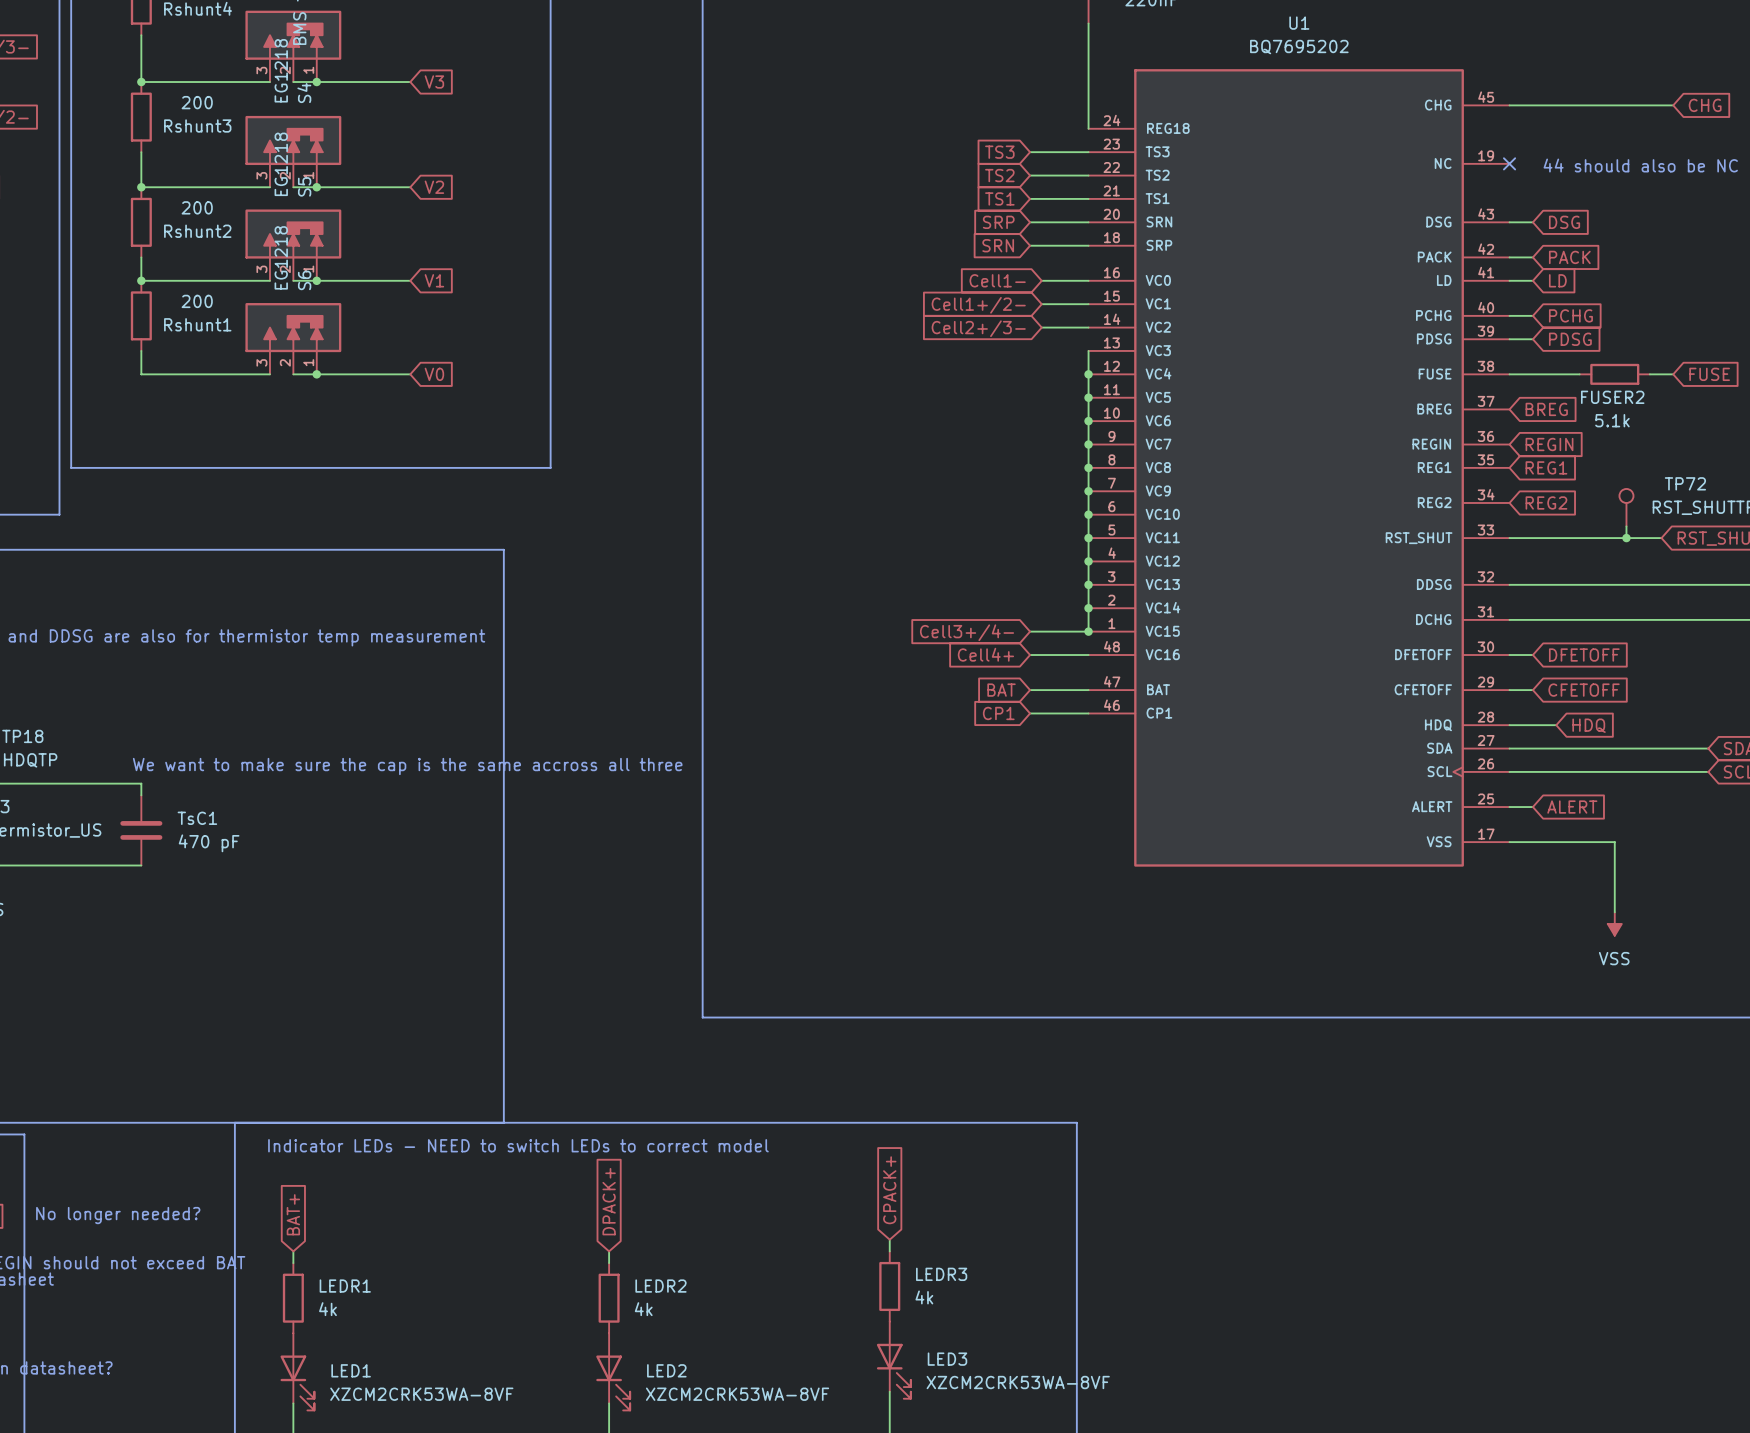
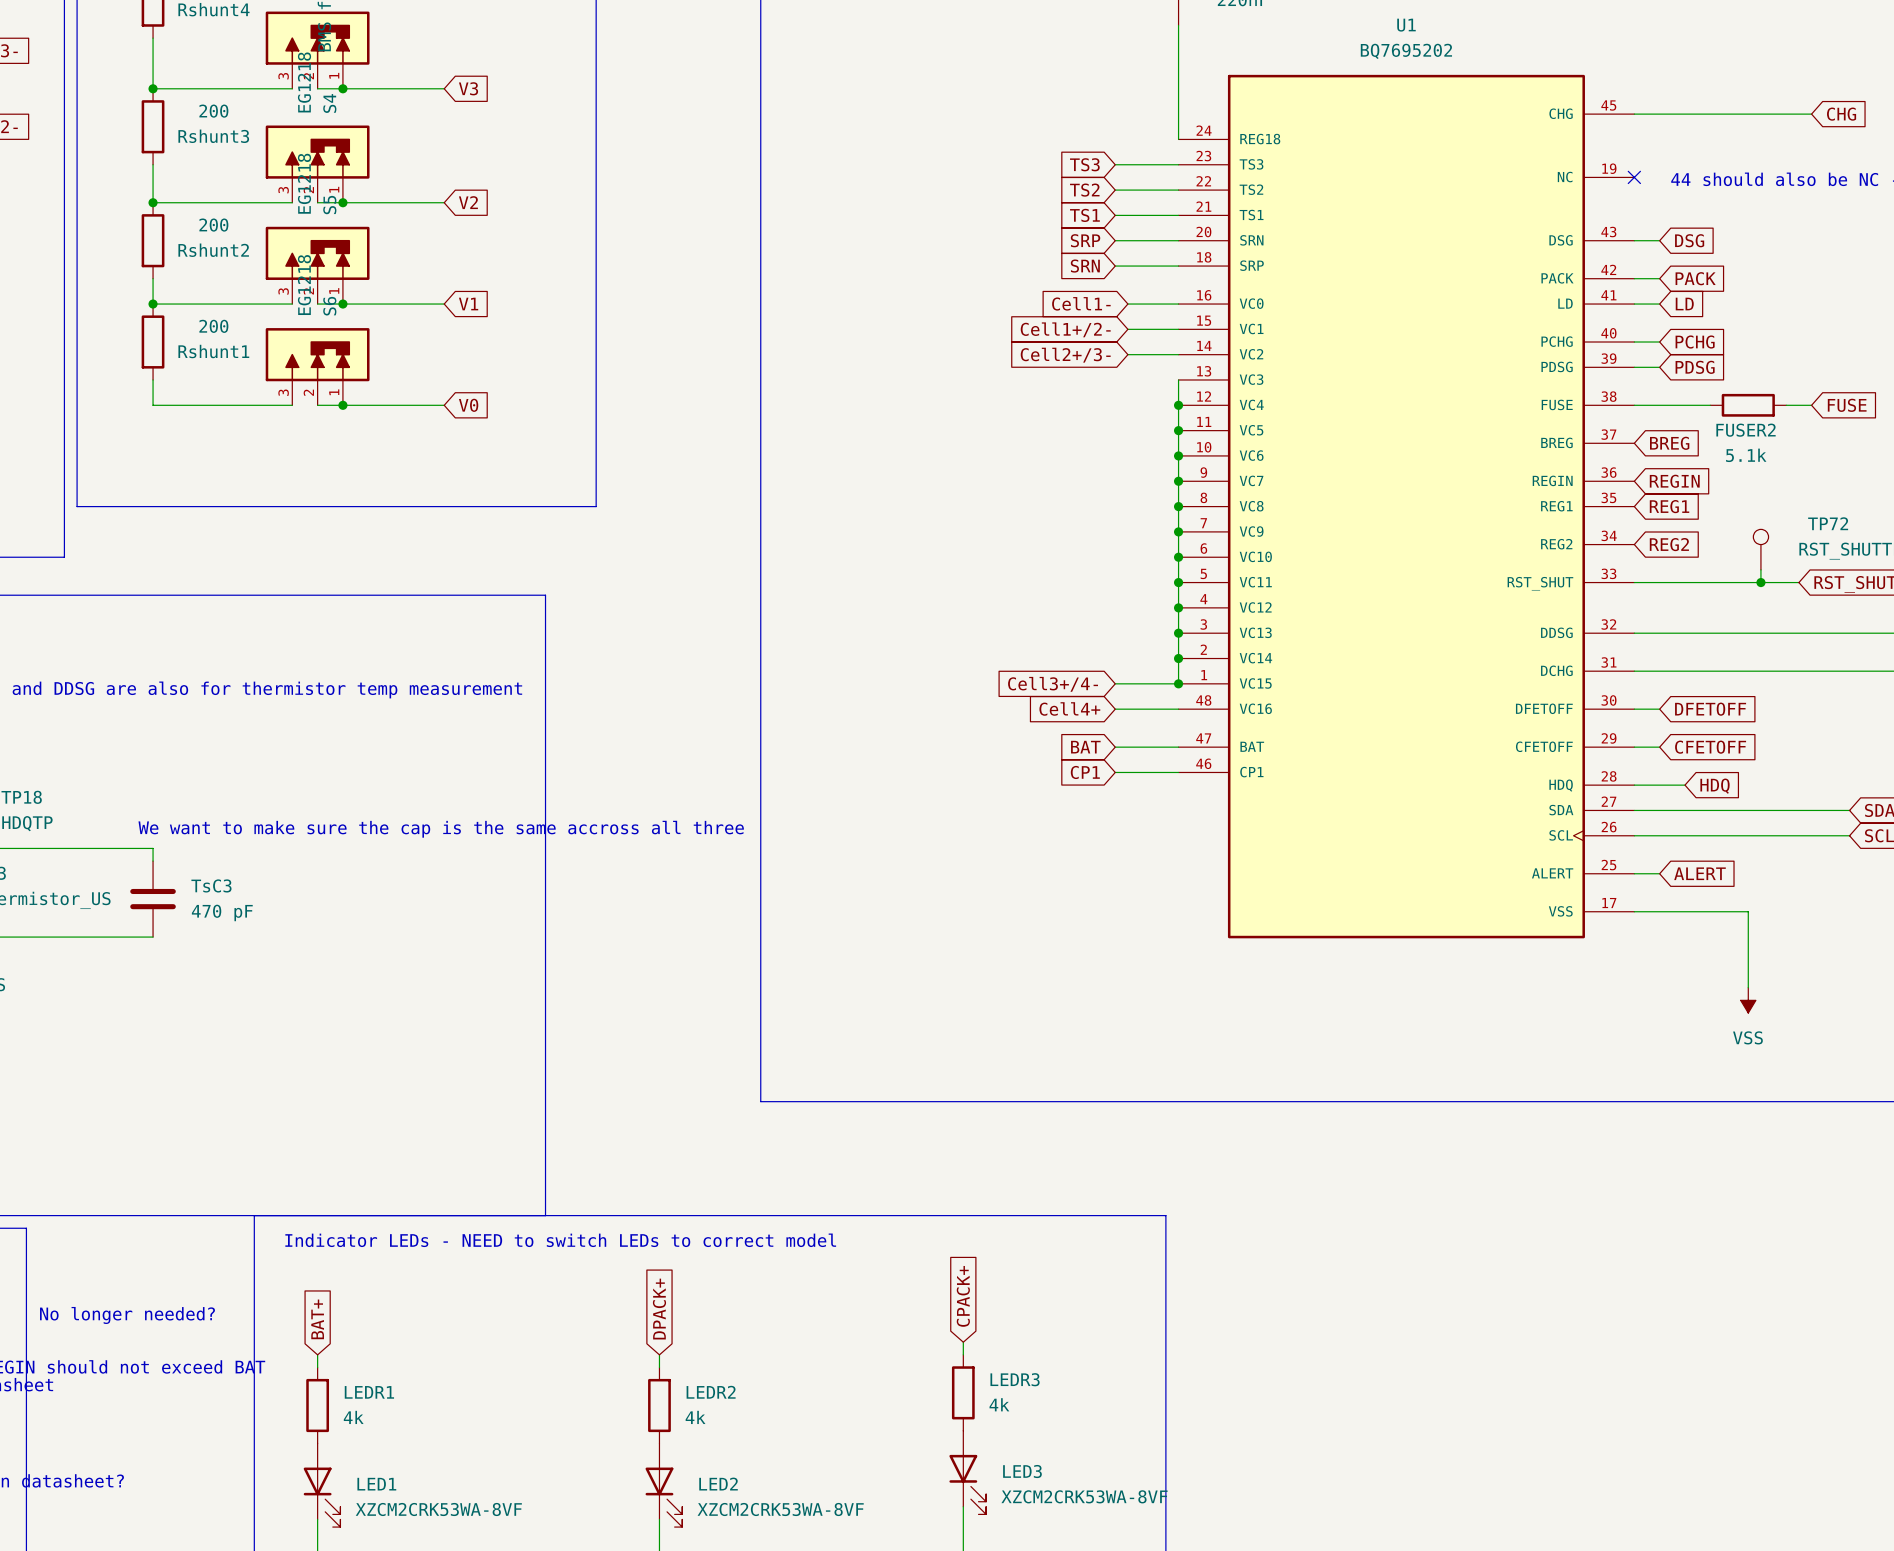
TsC1 name: TsC1 (197, 818) -> TsC3 (211, 885)

